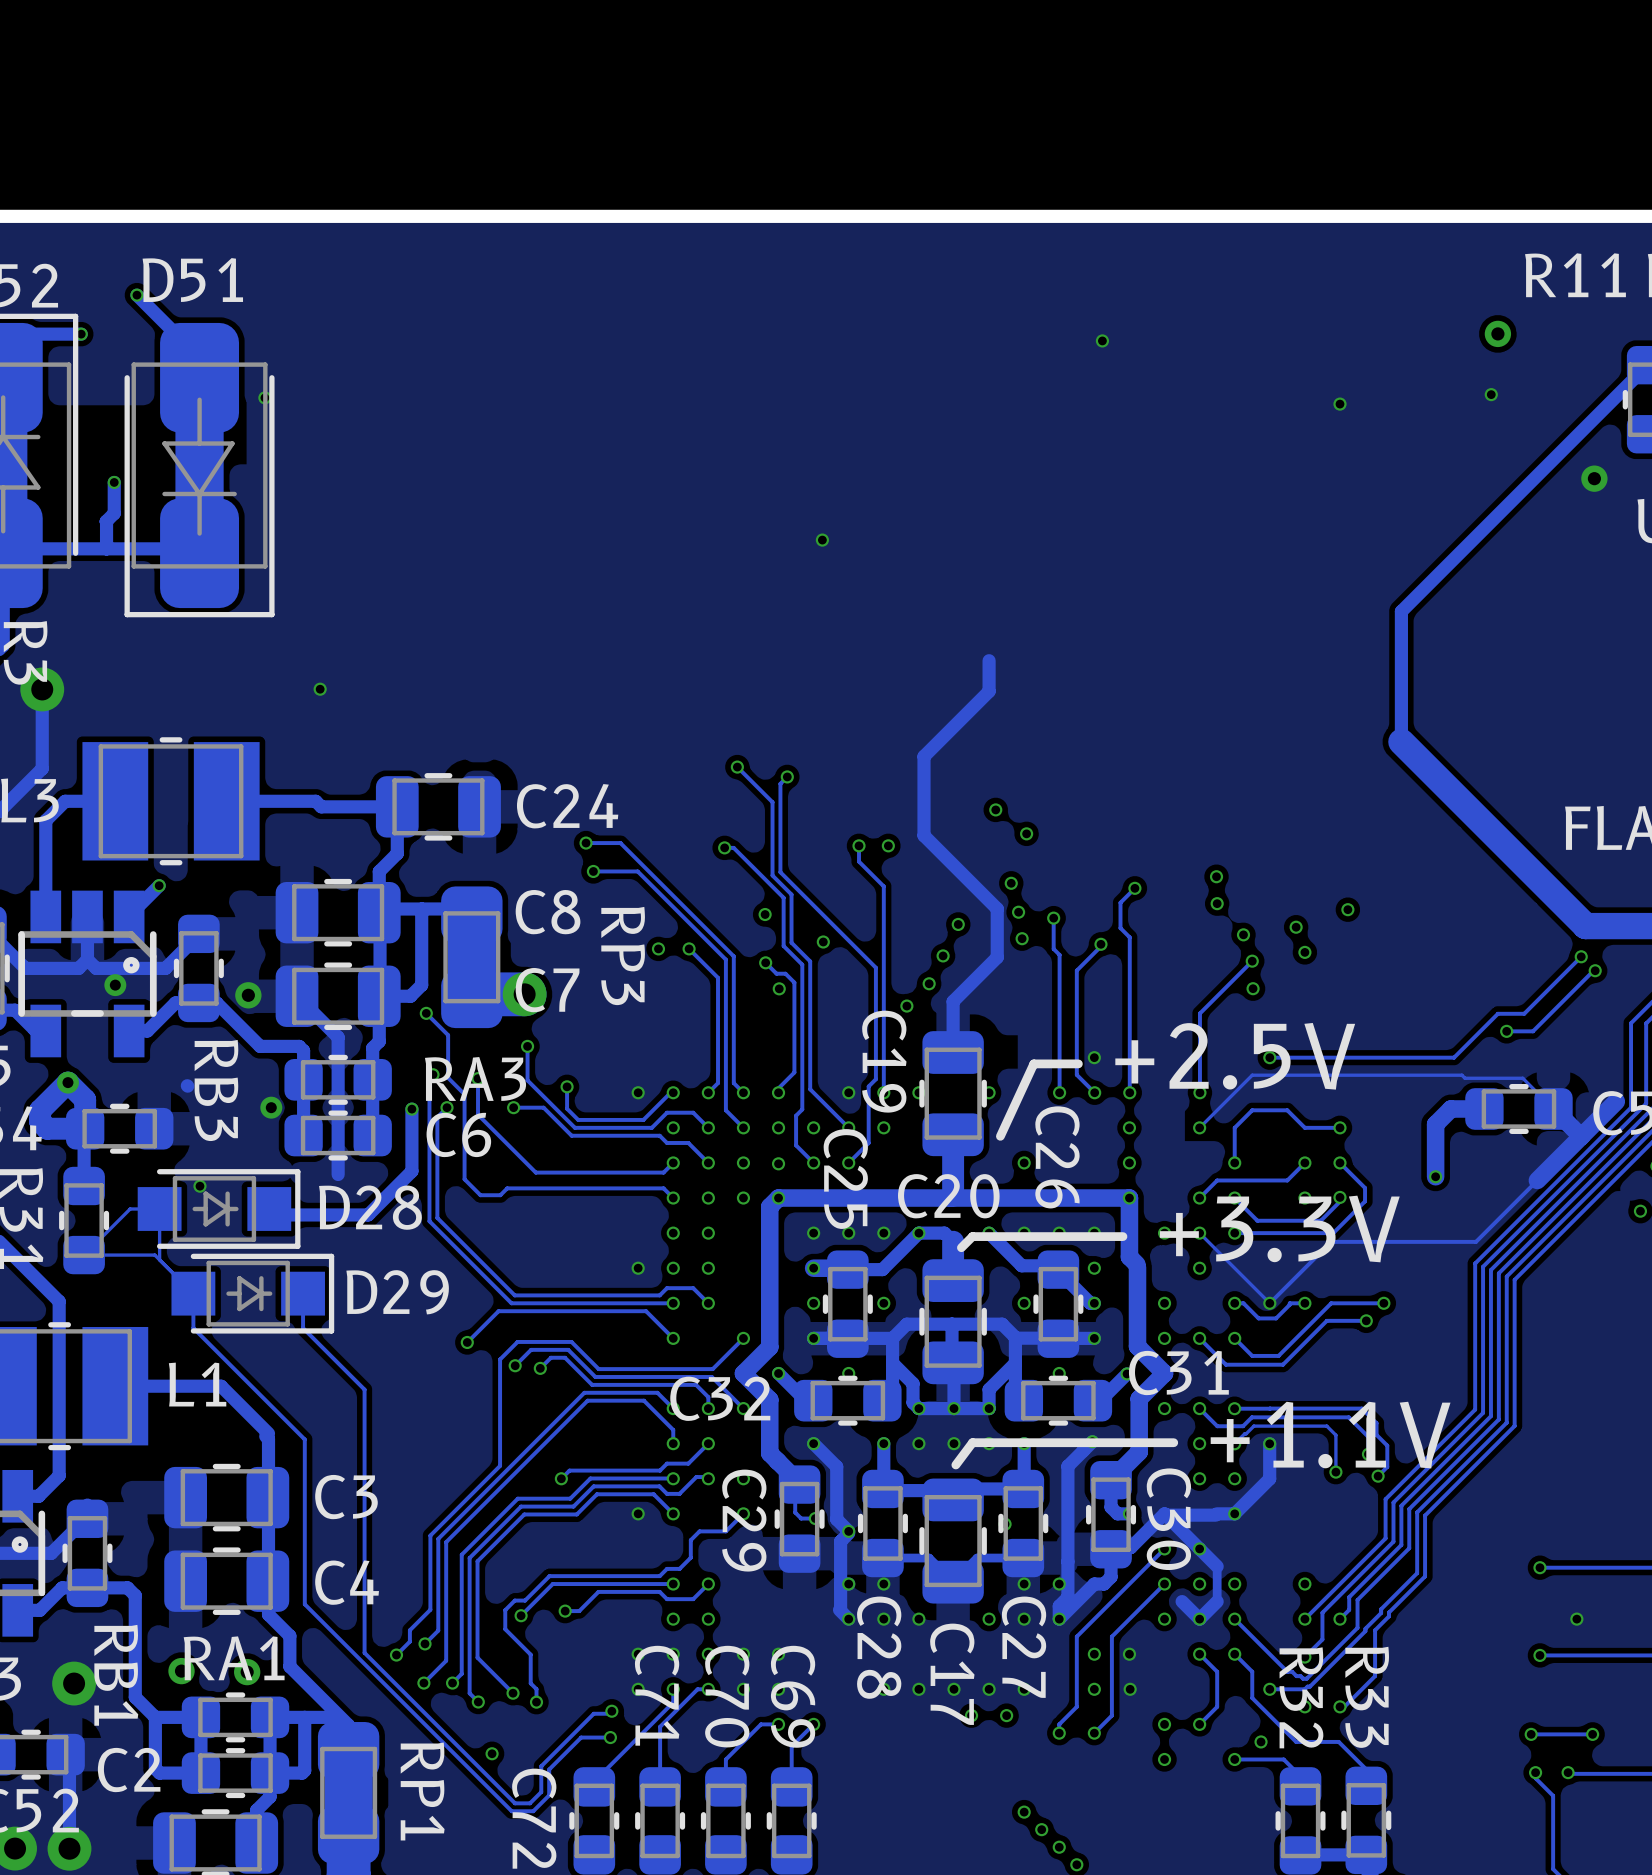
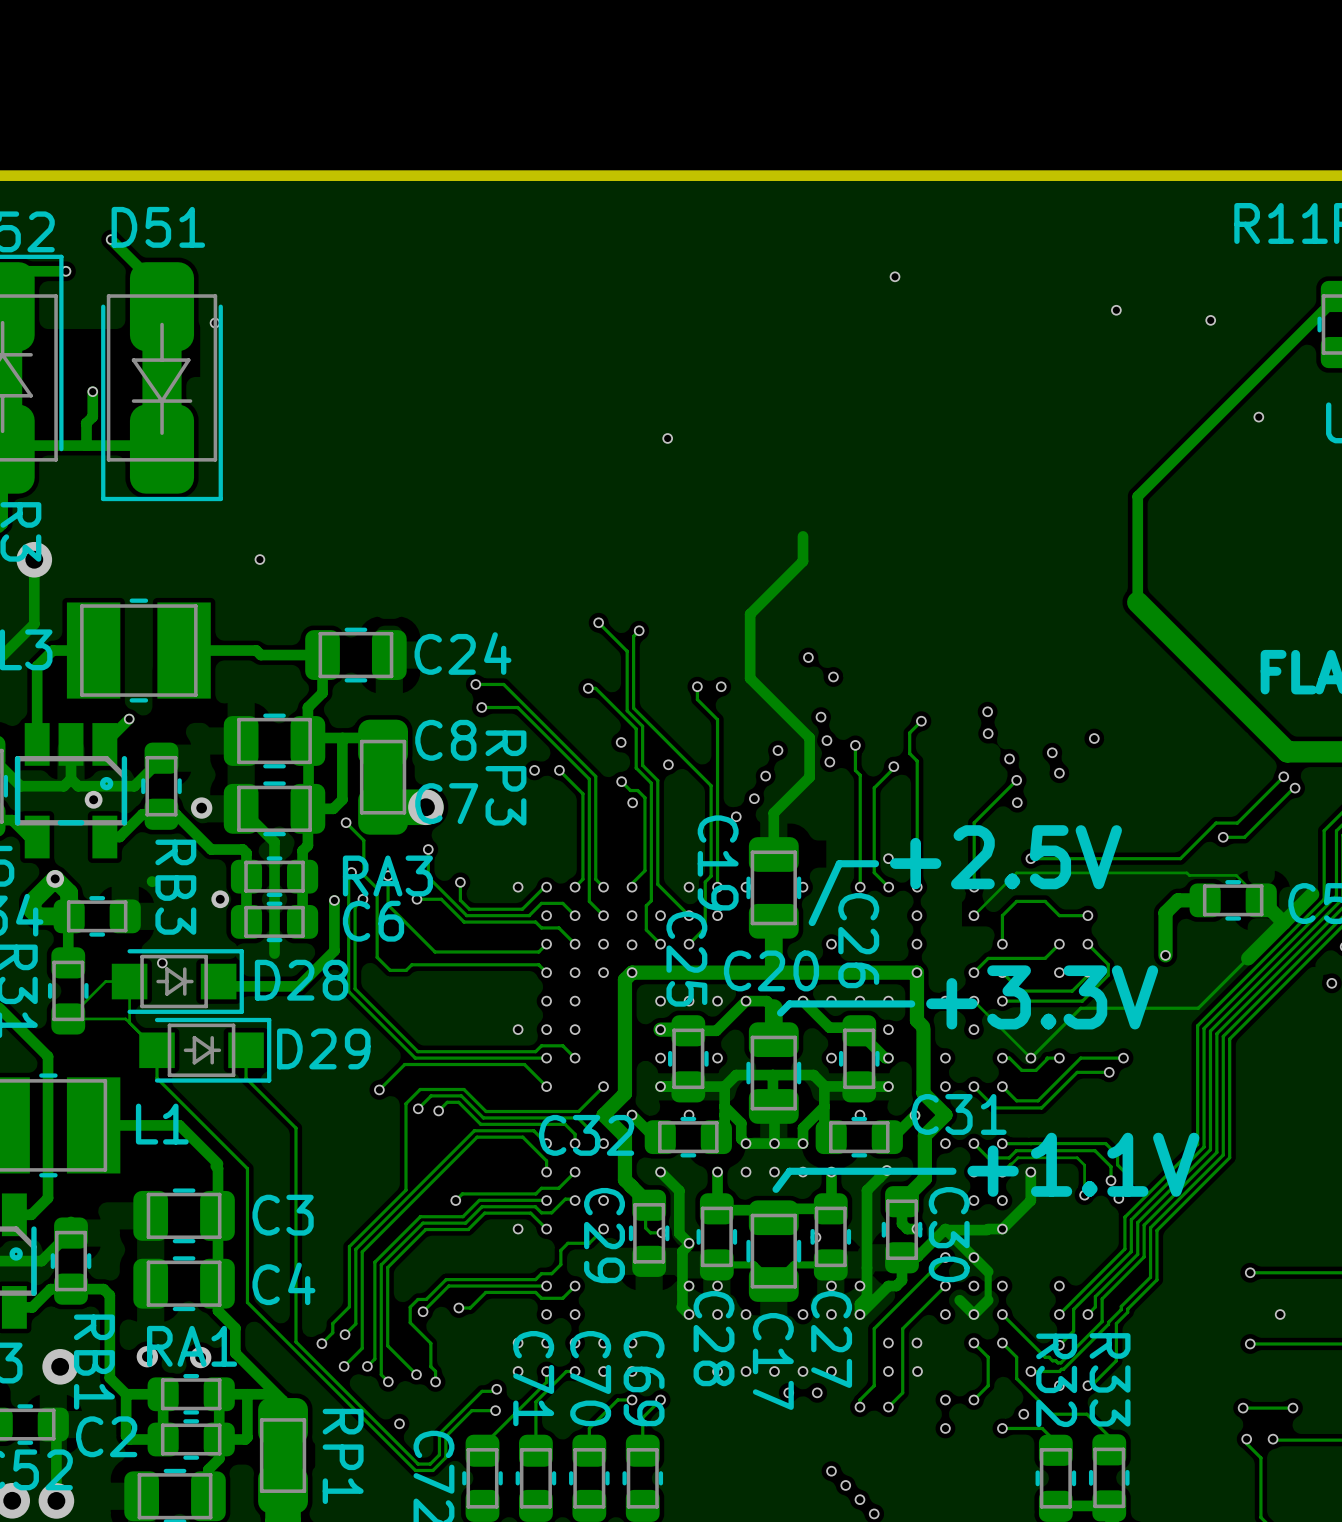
via: (1497, 333) -> none
via position: (1339, 404) -> (1116, 310)
via: (1594, 478) -> none
via: none -> (1258, 417)

